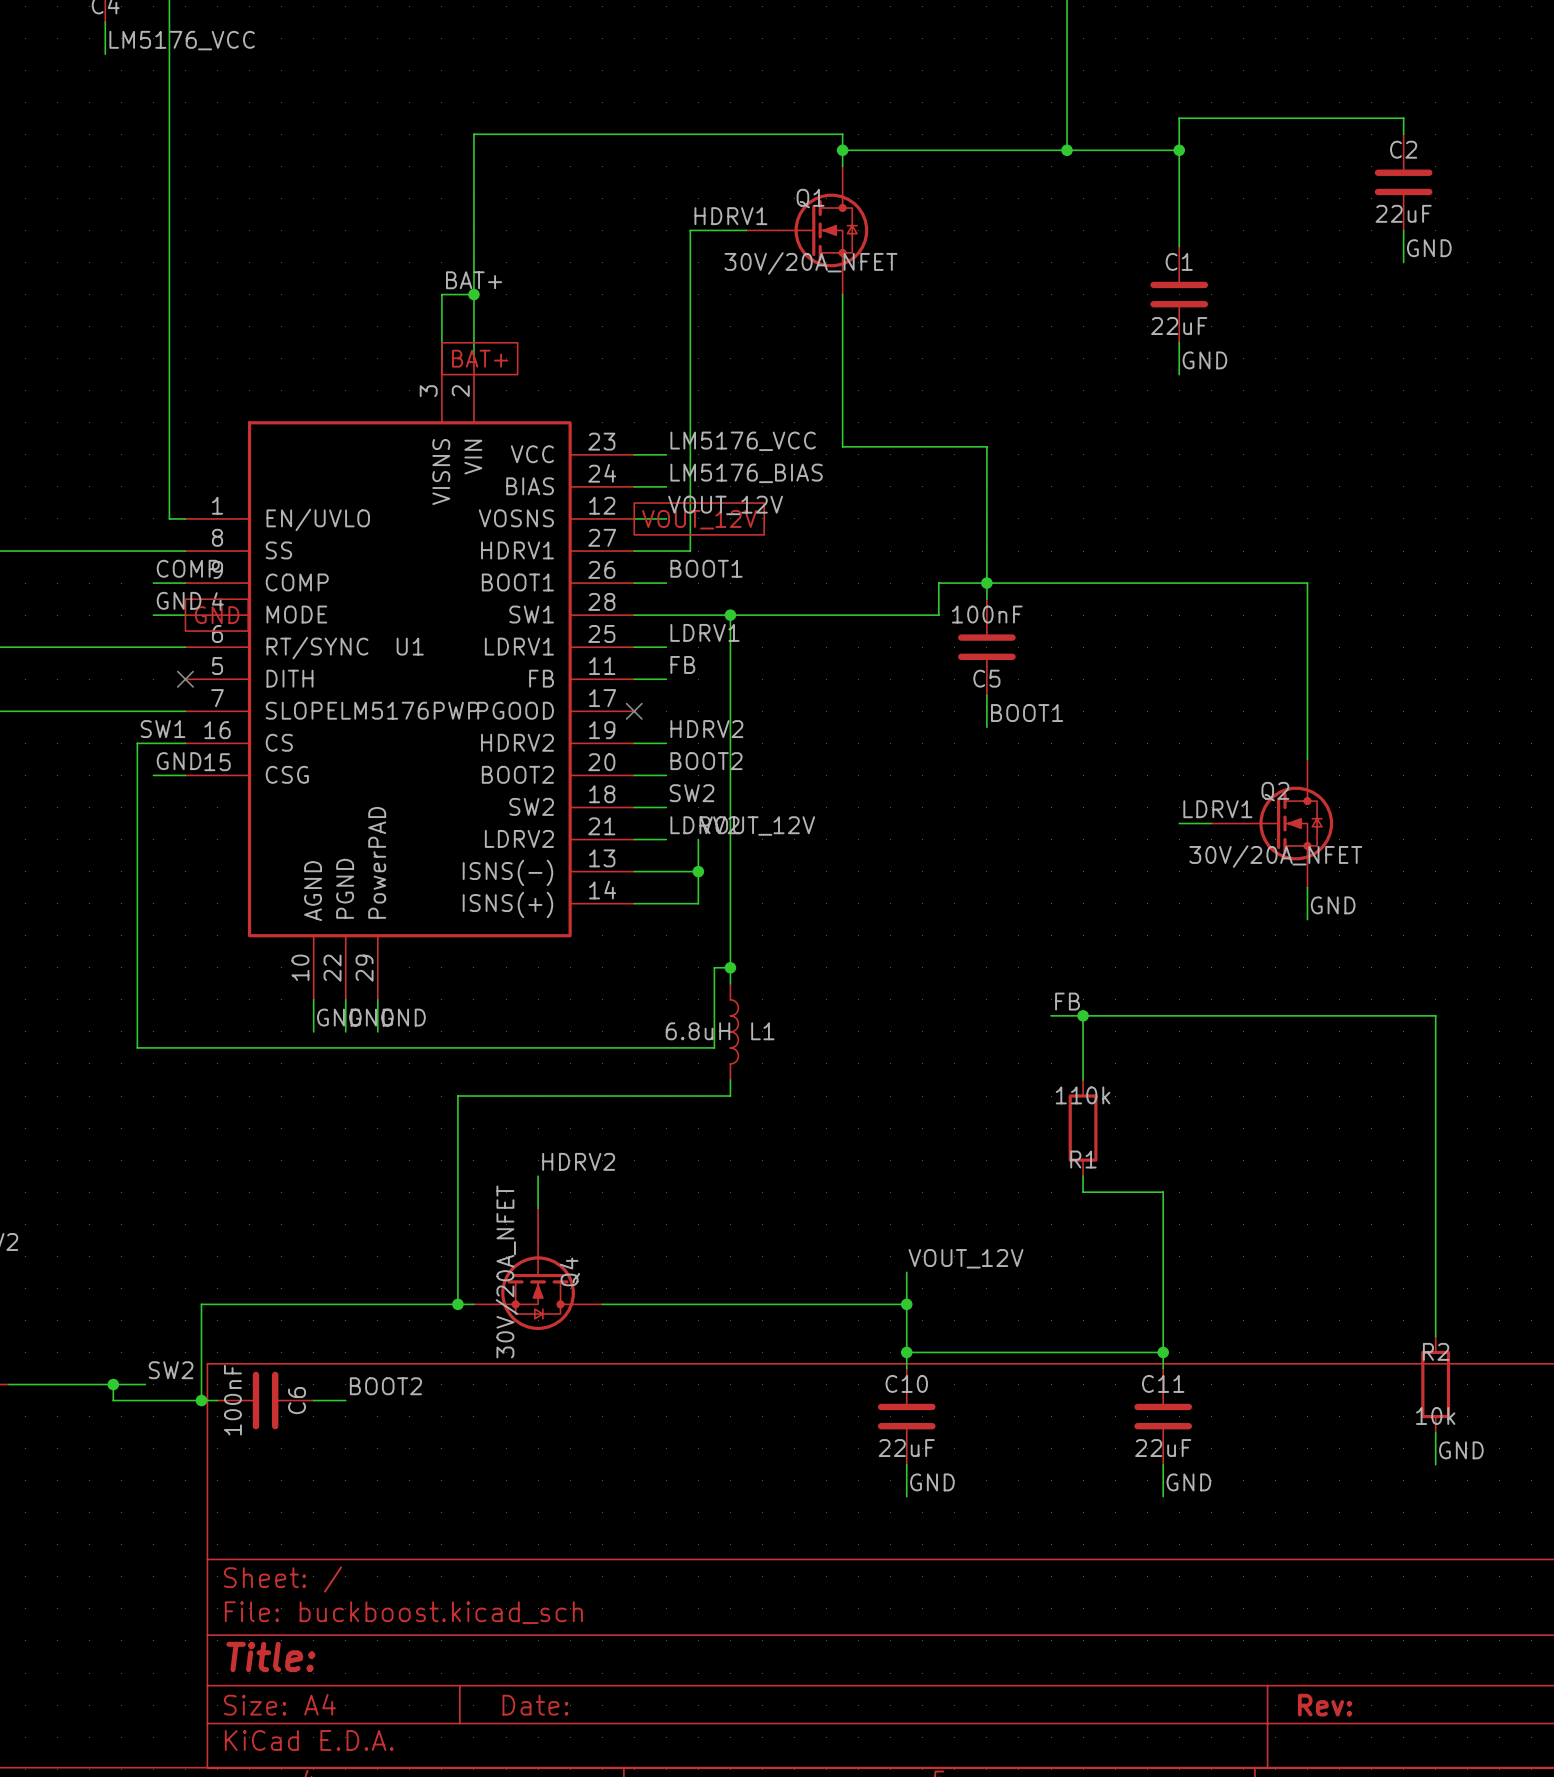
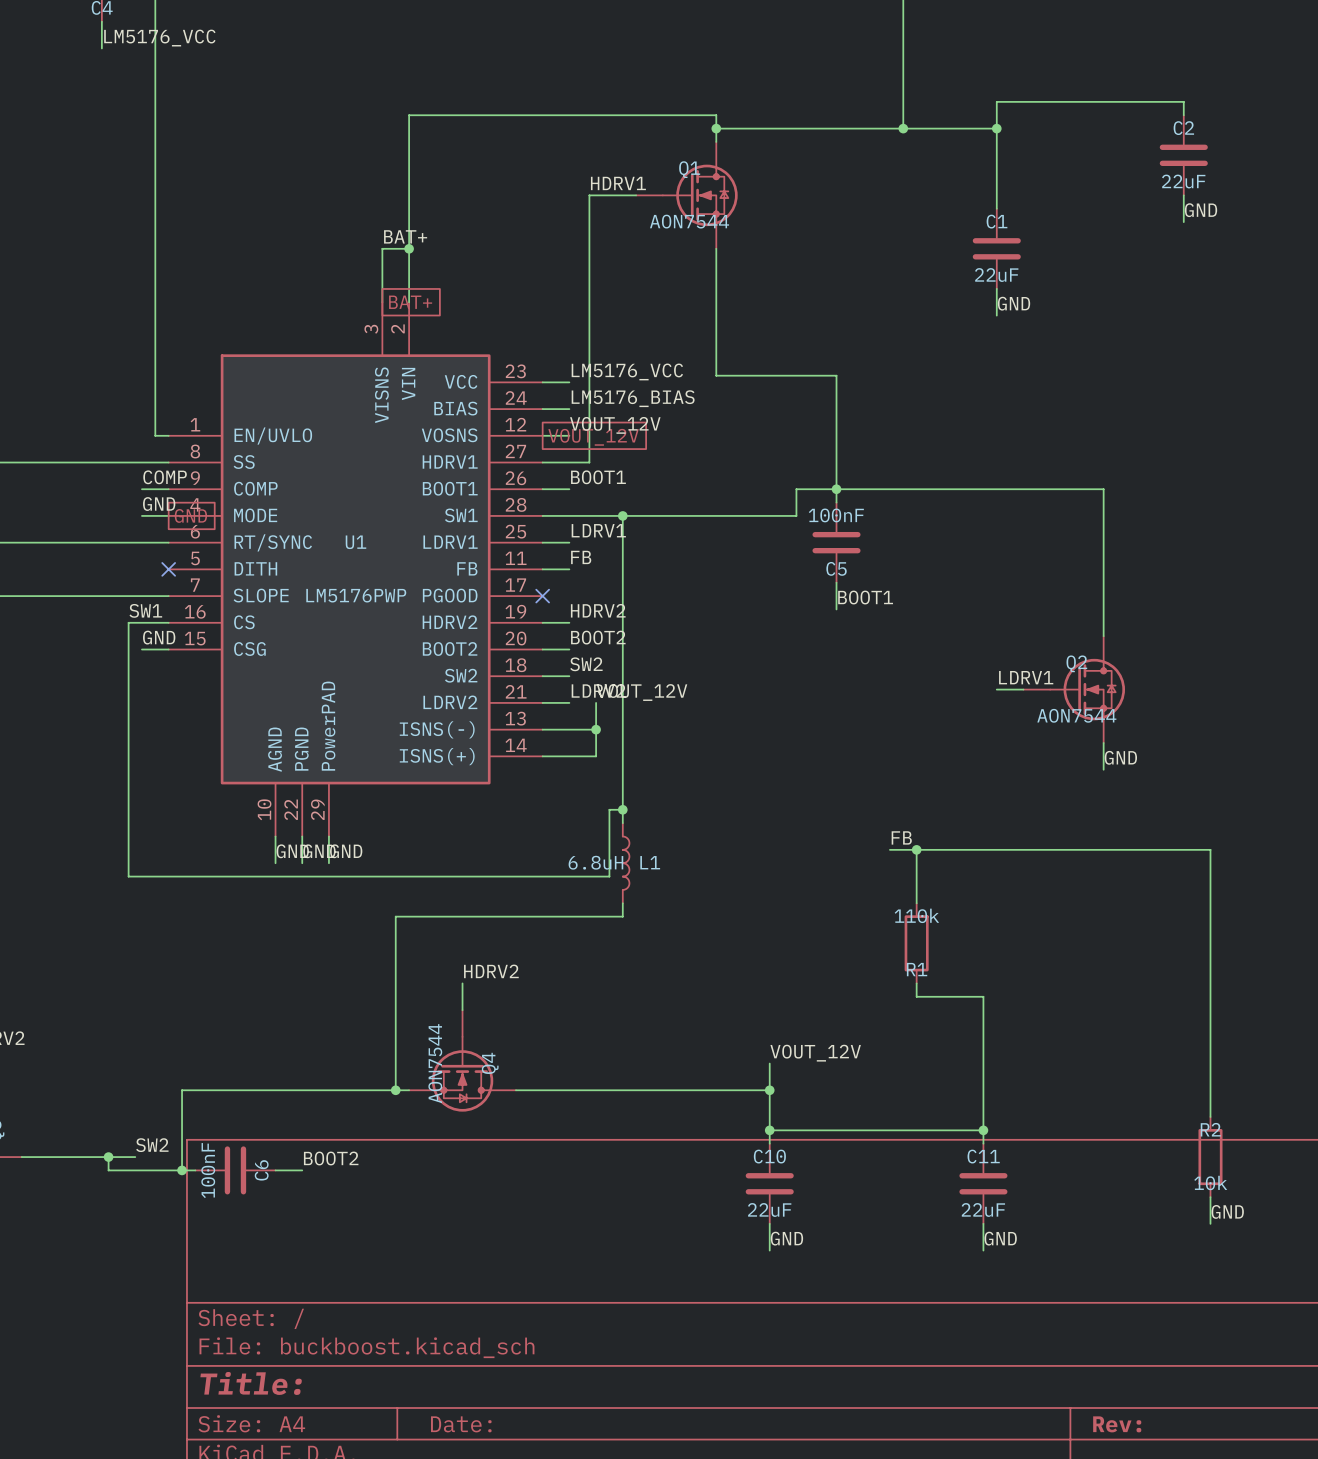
Q1 value: 30V/20A_NFET (810, 263) -> AON7544 (689, 221)
Q2 value: 30V/20A_NFET (1275, 856) -> AON7544 (1076, 715)
Q4 value: 30V/20A_NFET (506, 1271) -> AON7544 (435, 1063)

